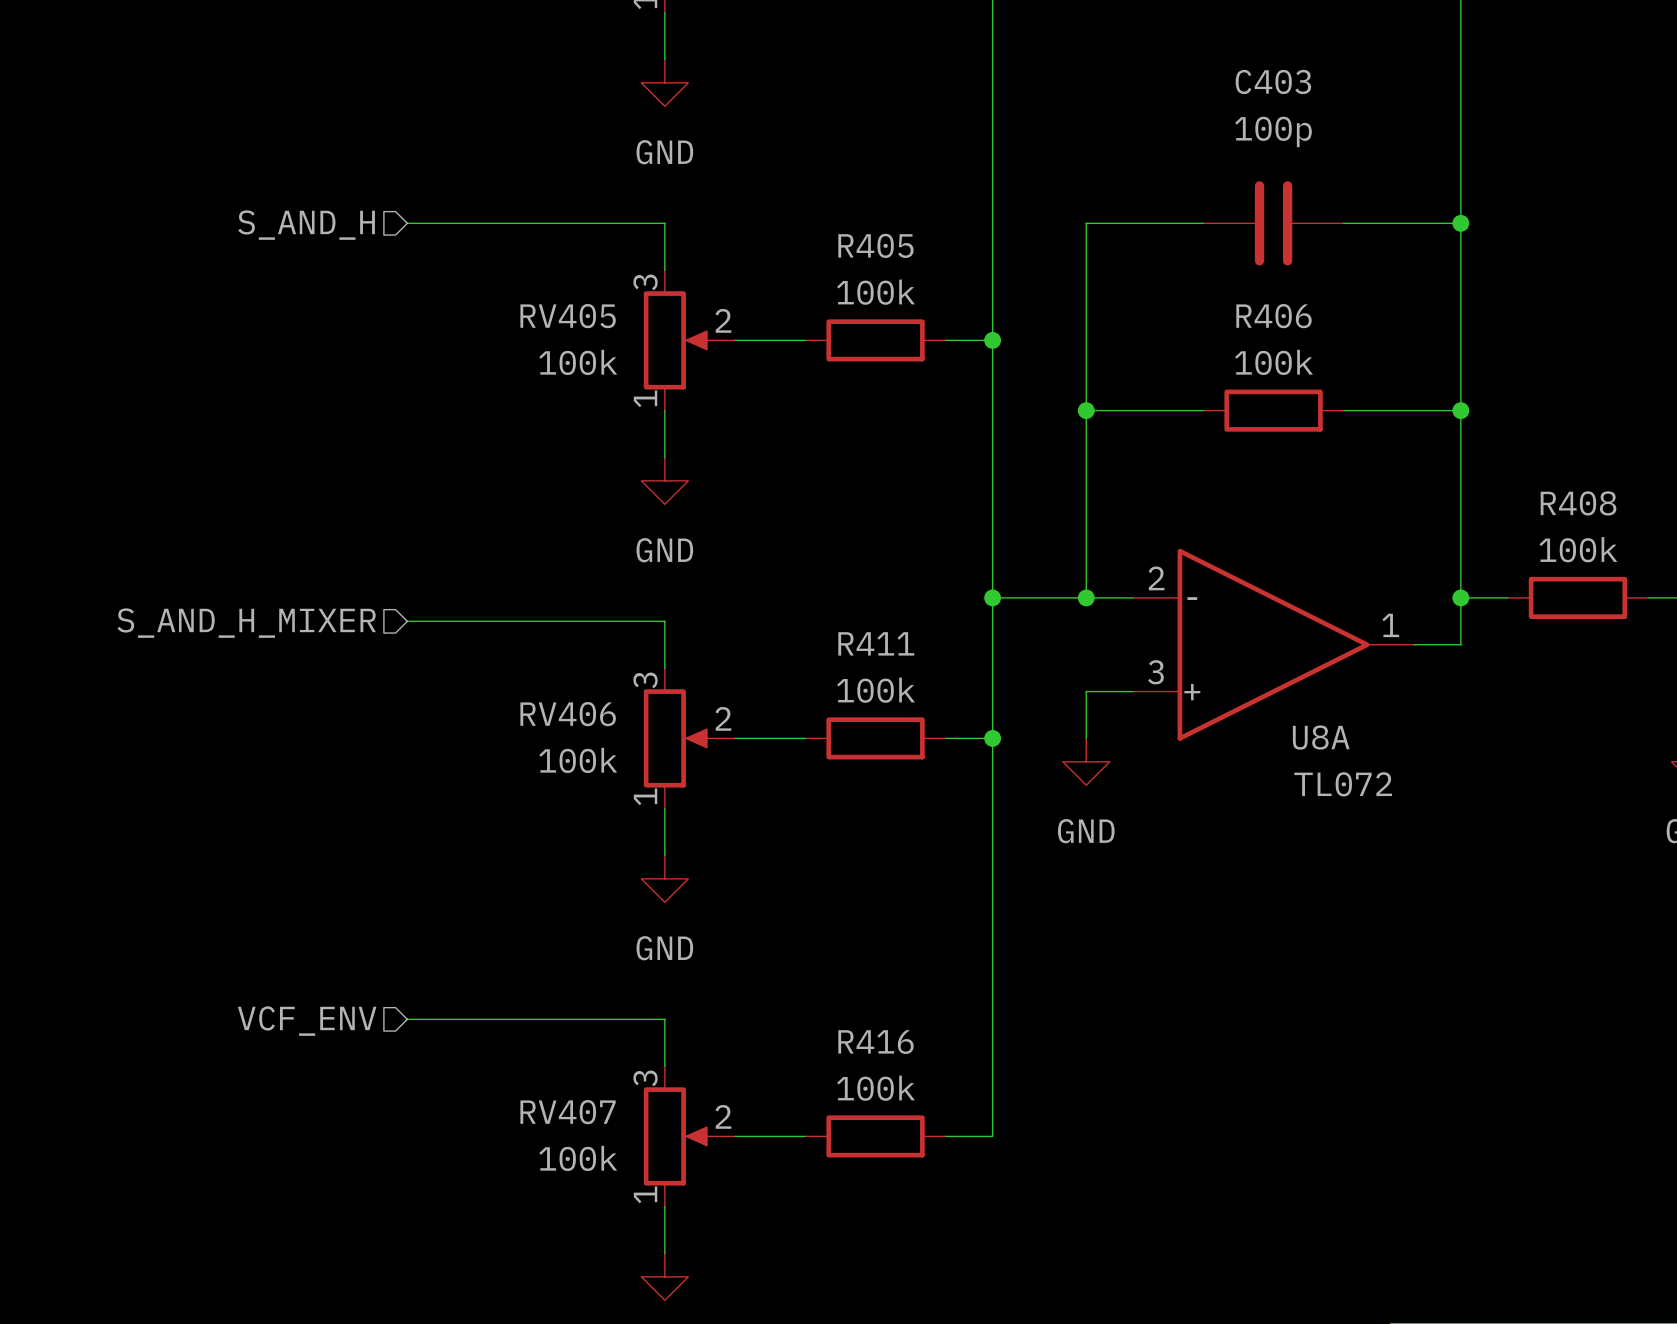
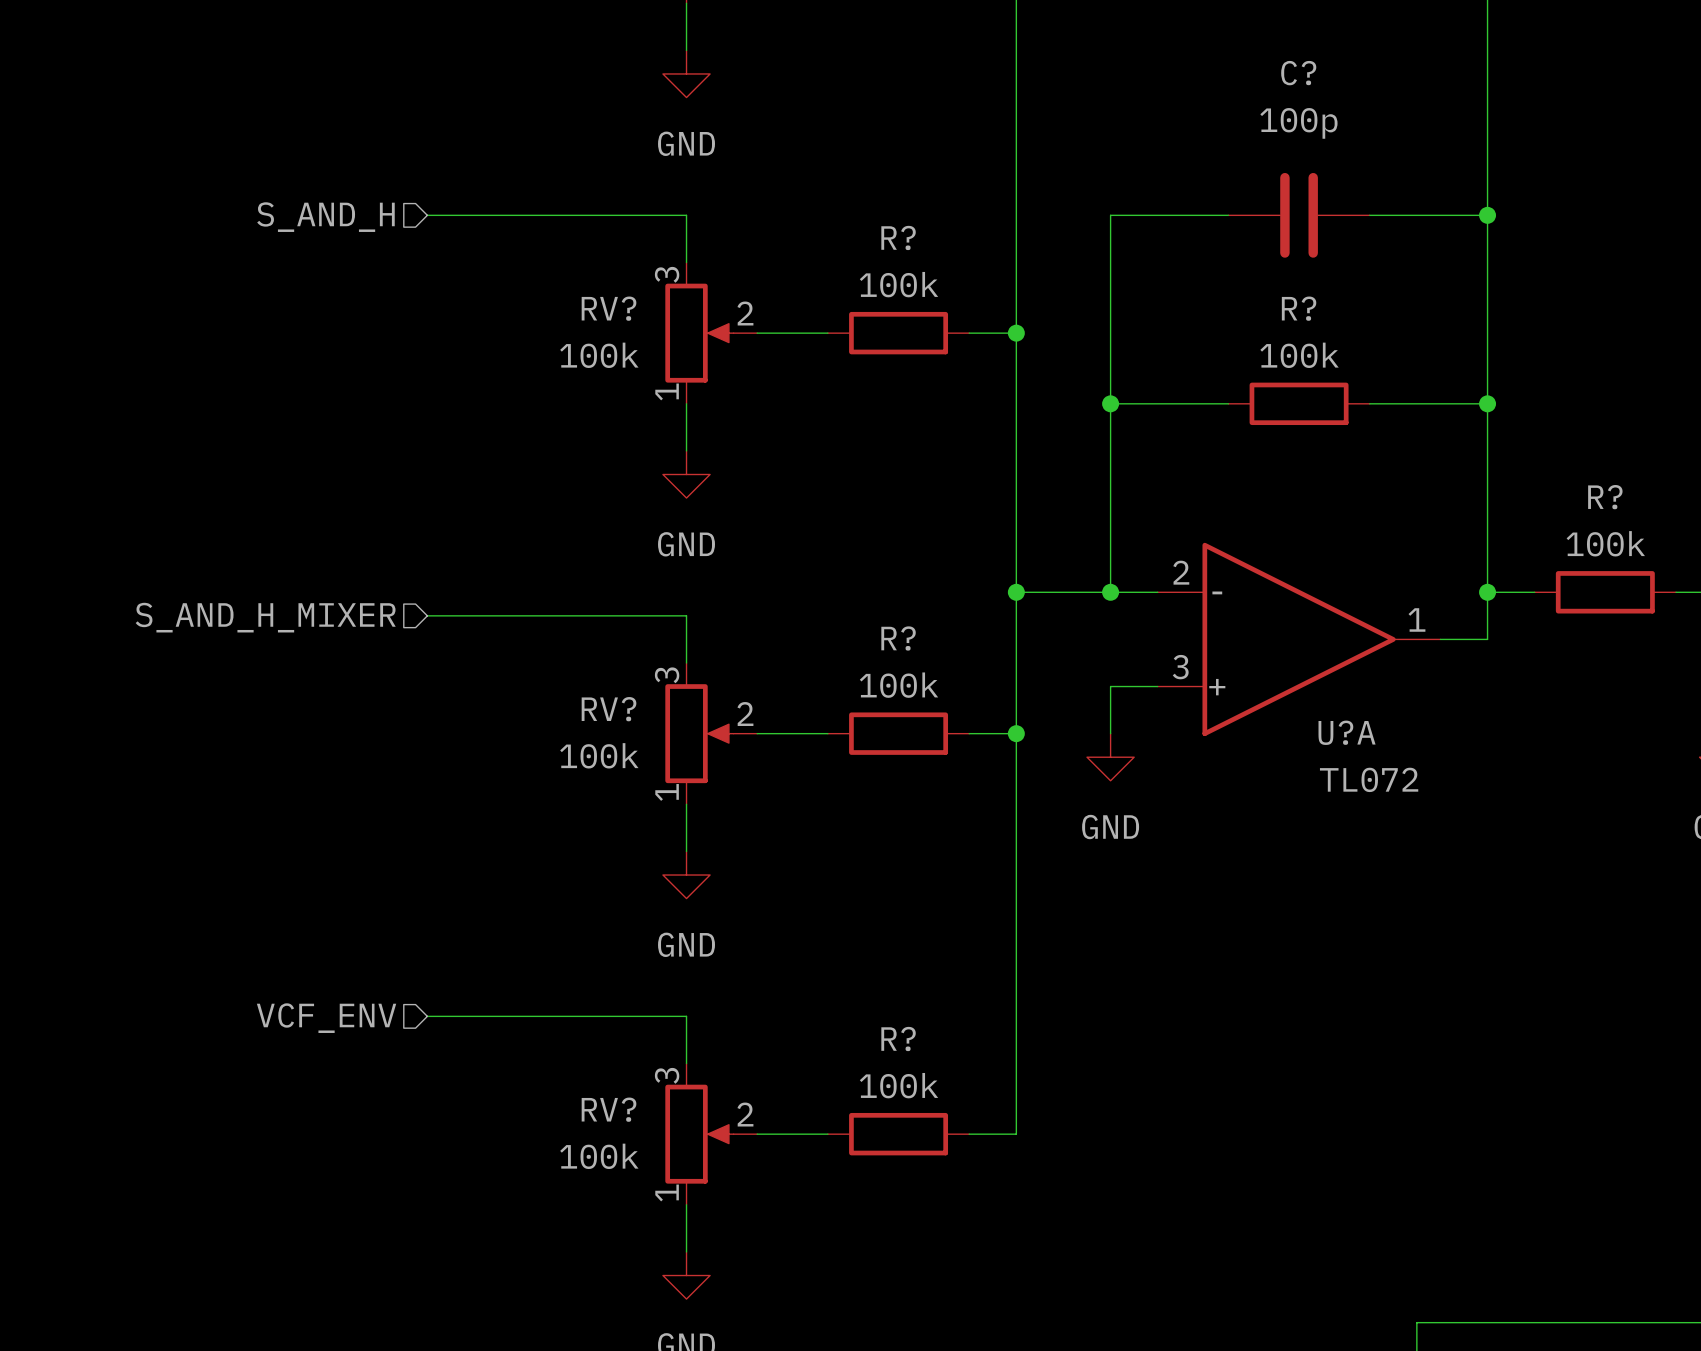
C403 name: C403 (1273, 81) -> C? (1298, 73)
R405 name: R405 (875, 245) -> R? (898, 237)
RV405 name: RV405 (568, 316) -> RV? (609, 308)
R406 name: R406 (1274, 316) -> R? (1299, 308)
R408 name: R408 (1578, 503) -> R? (1605, 497)
R411 name: R411 (876, 643) -> R? (898, 638)
RV406 name: RV406 (568, 714) -> RV? (609, 709)
U8A name: U8A (1321, 737) -> U?A (1347, 732)
R416 name: R416 (876, 1042) -> R? (898, 1039)
RV407 name: RV407 (568, 1112) -> RV? (609, 1109)

